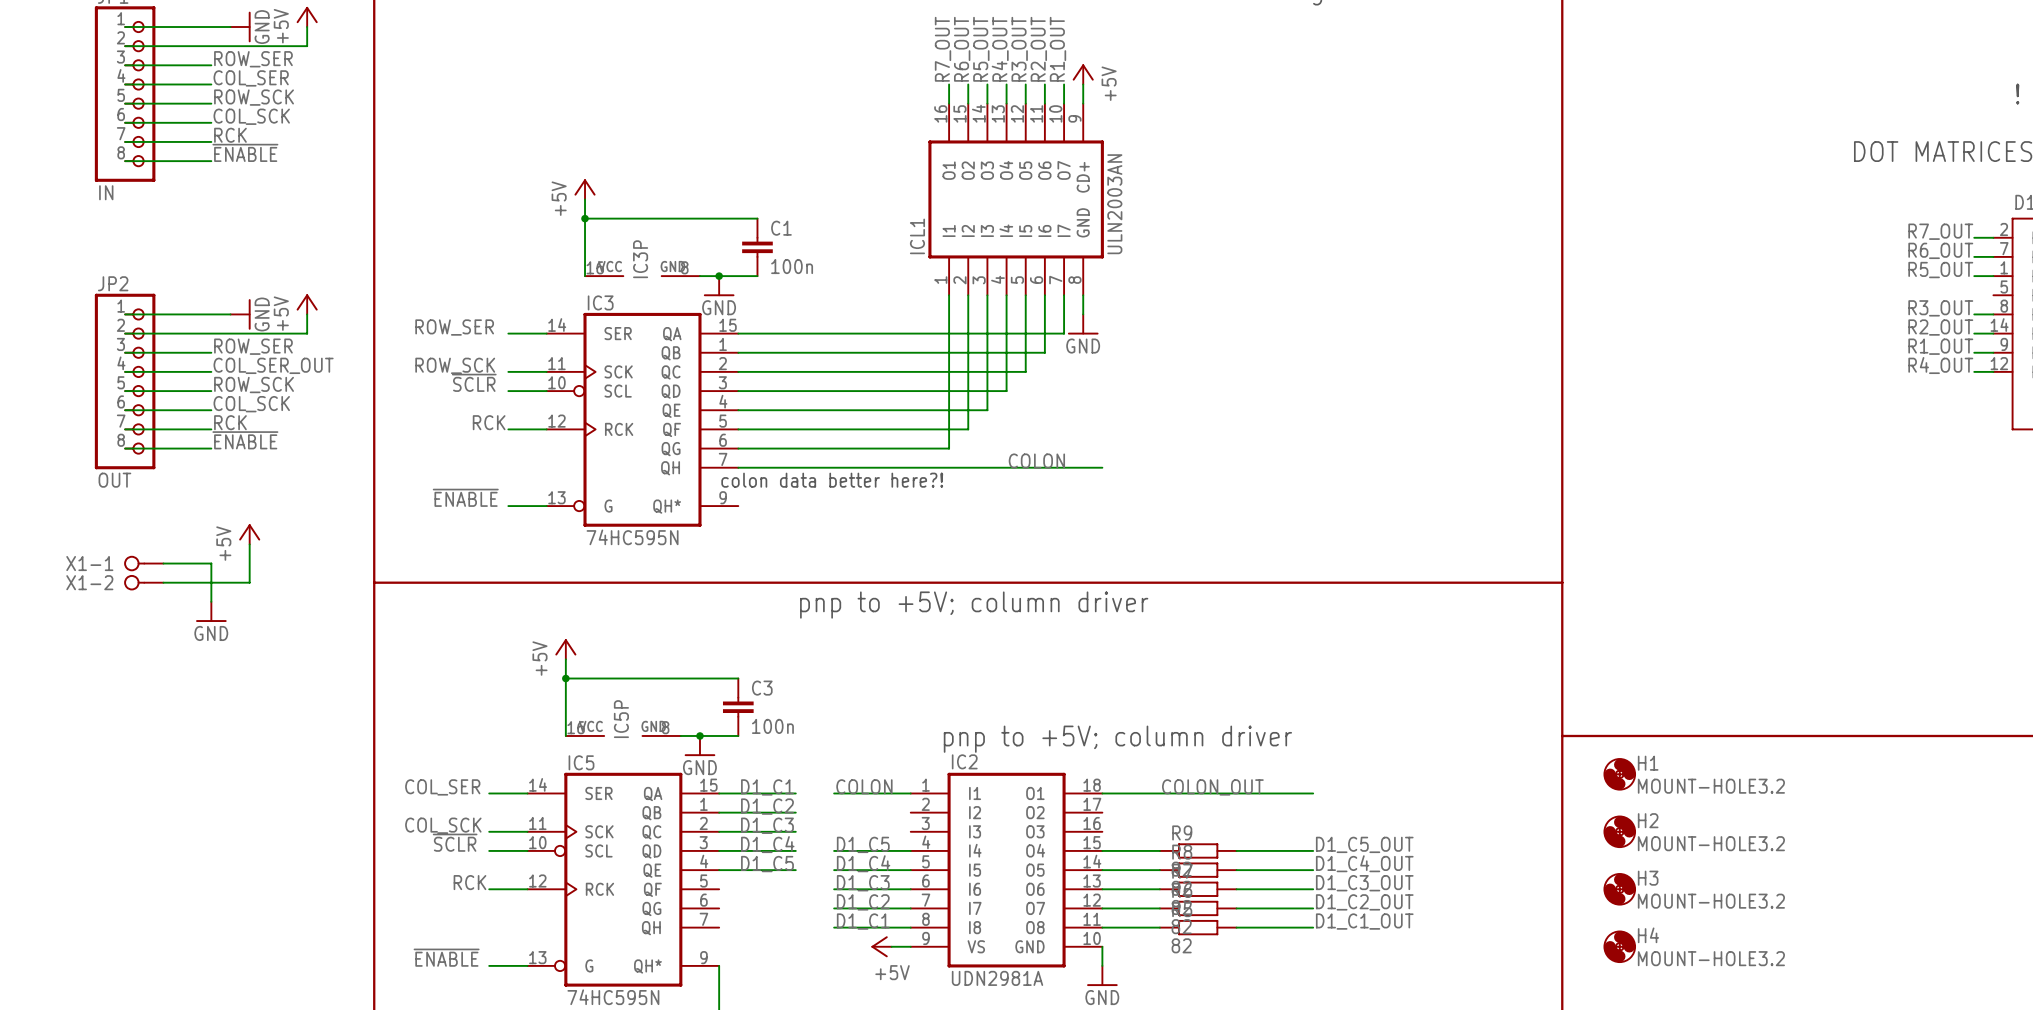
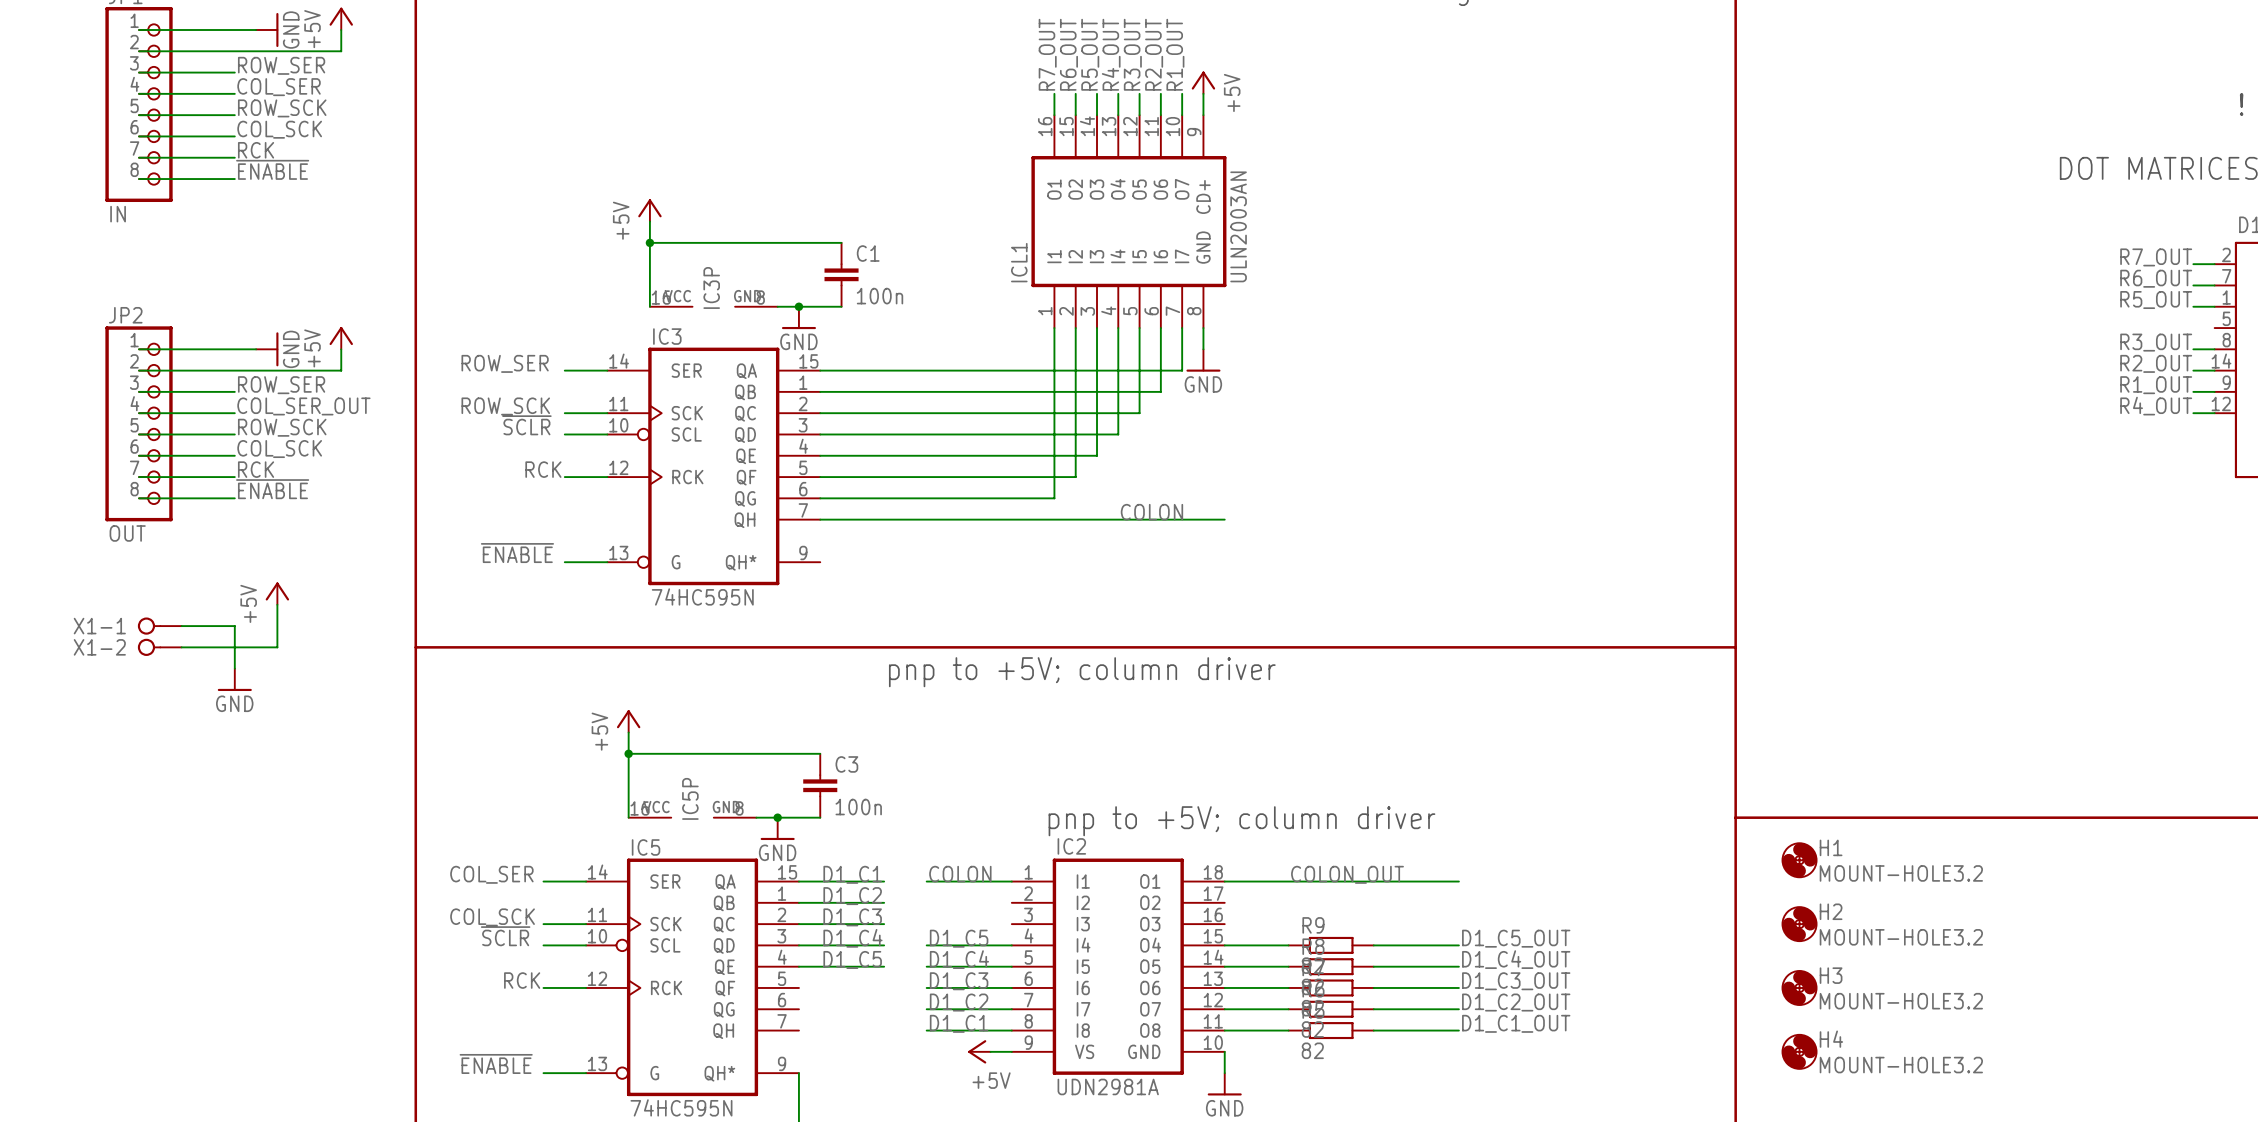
text: colon data better here?! (832, 480) -> none

